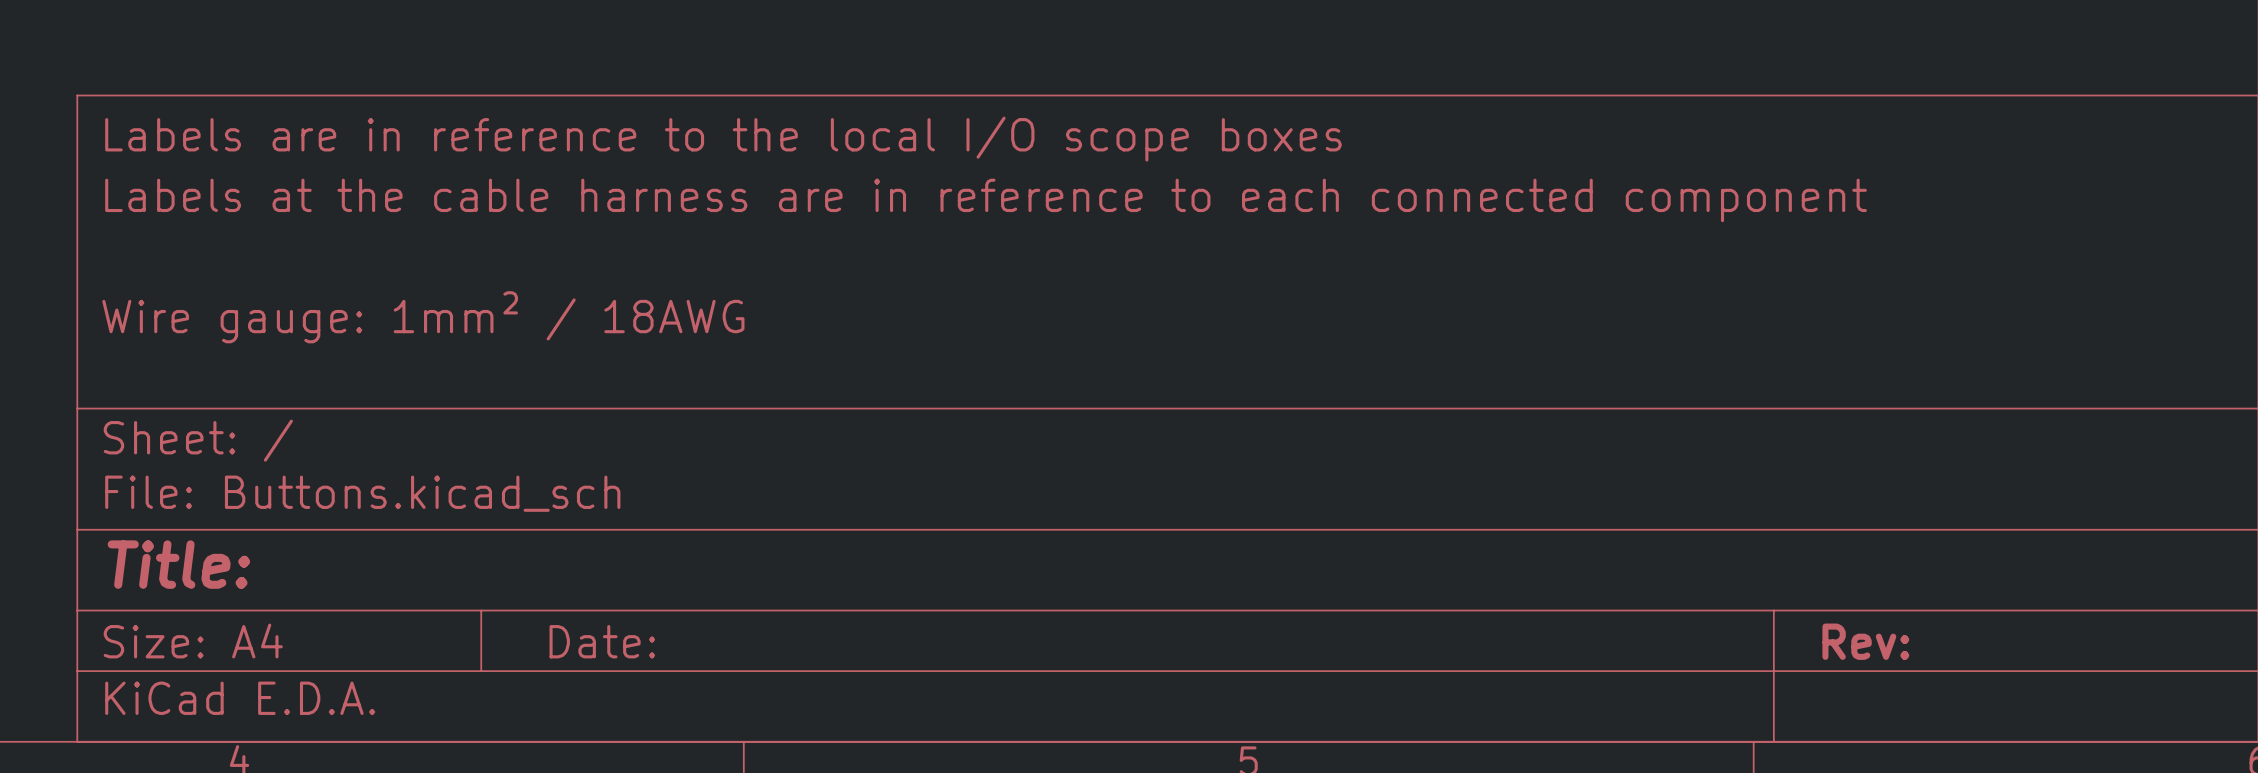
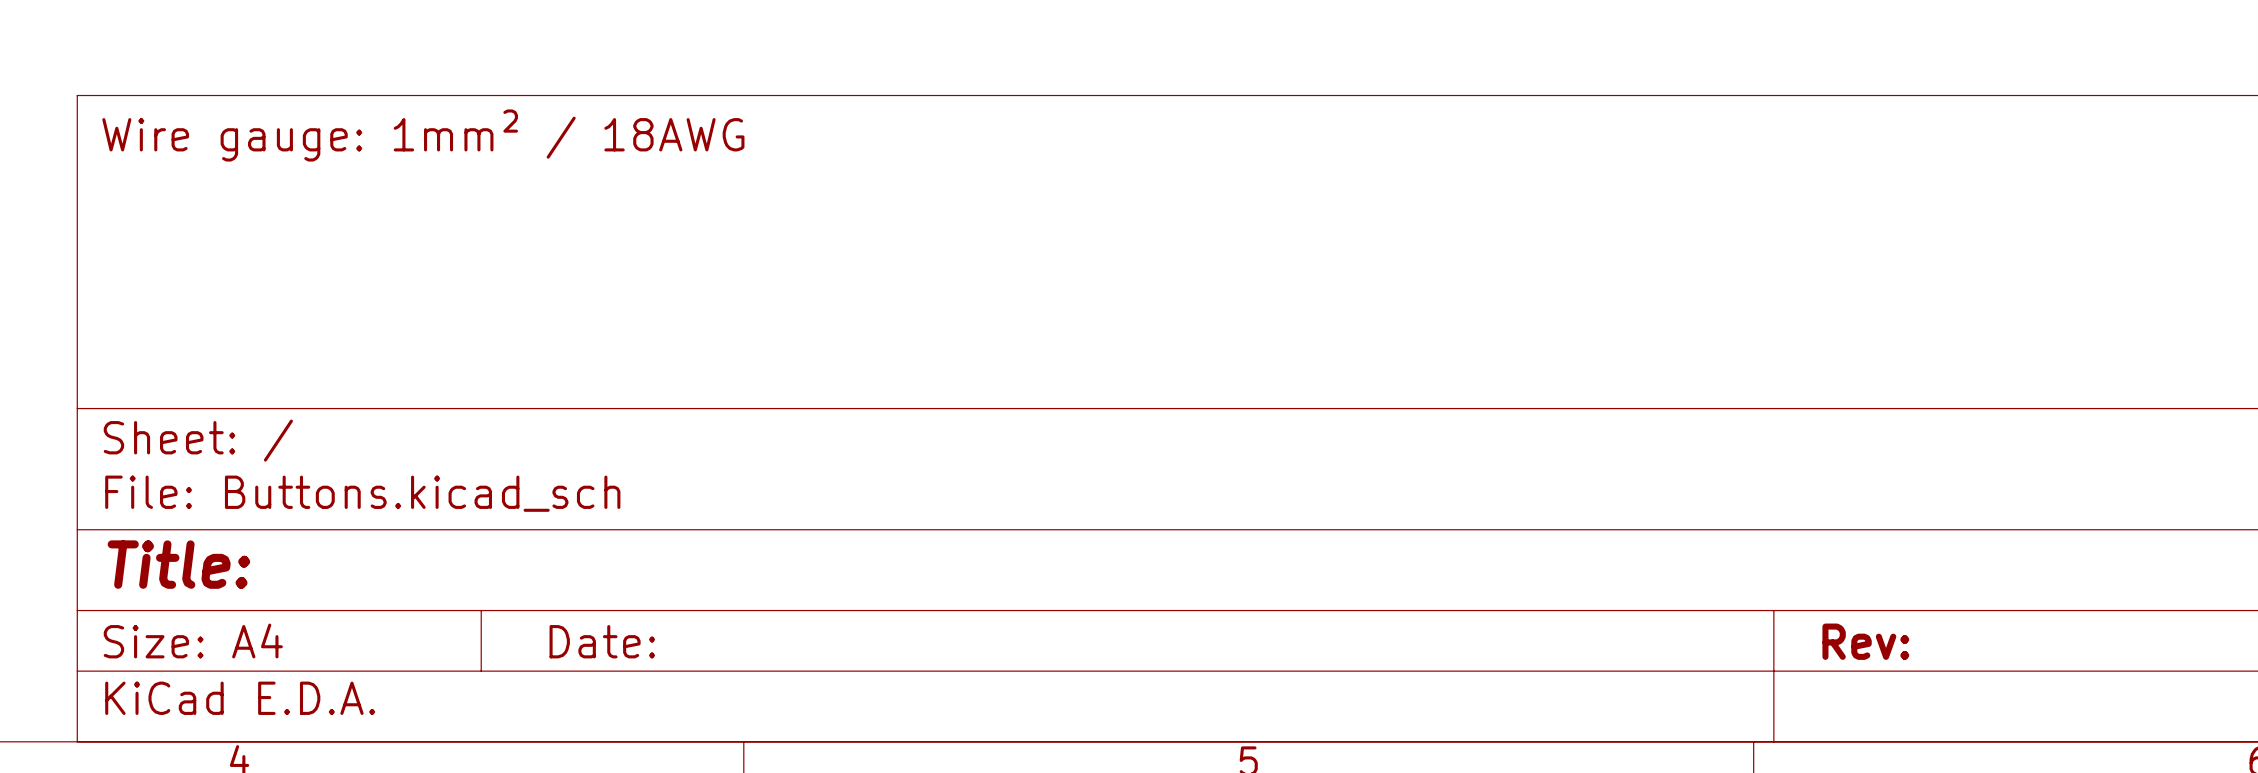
title block: Labels are in reference to the local I/O scope boxes (723, 139) -> Wire gauge: 1mm² / 18AWG (423, 135)
title block: Labels at the cable harness are in reference to each connected component (986, 200) -> none
title block: Wire gauge: 1mm² / 18AWG (423, 317) -> none

